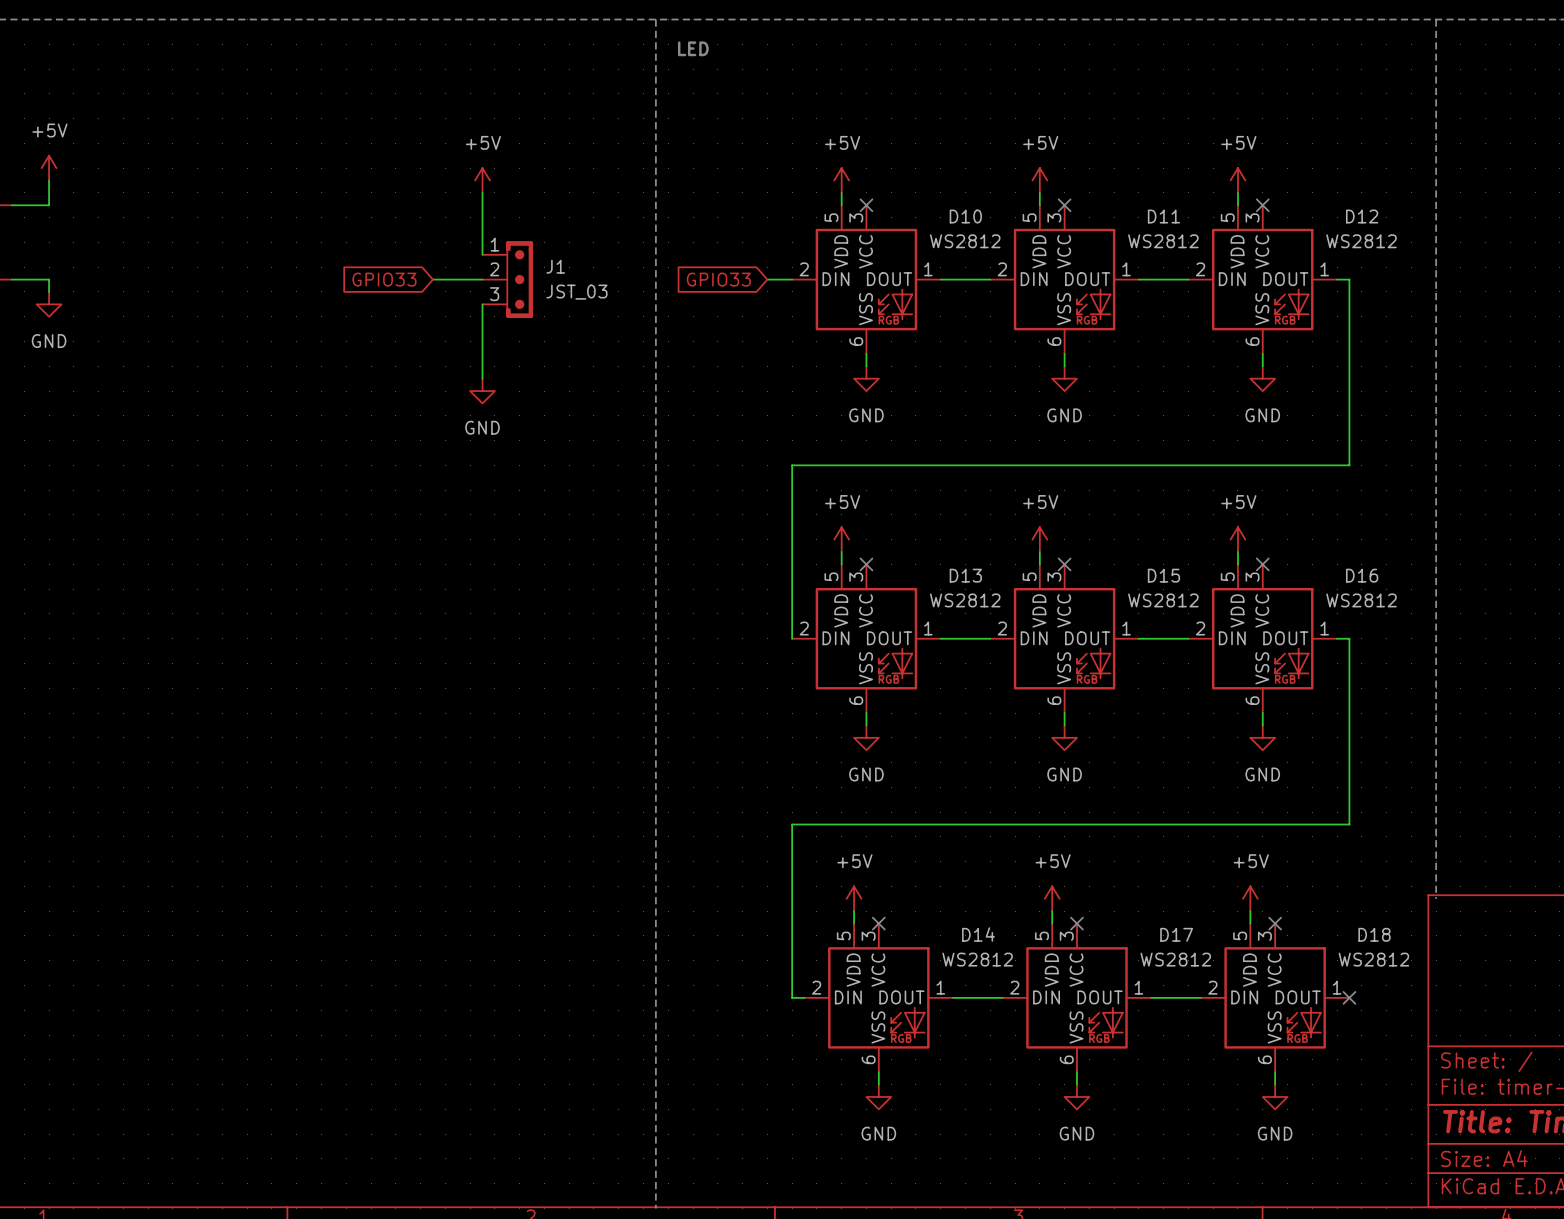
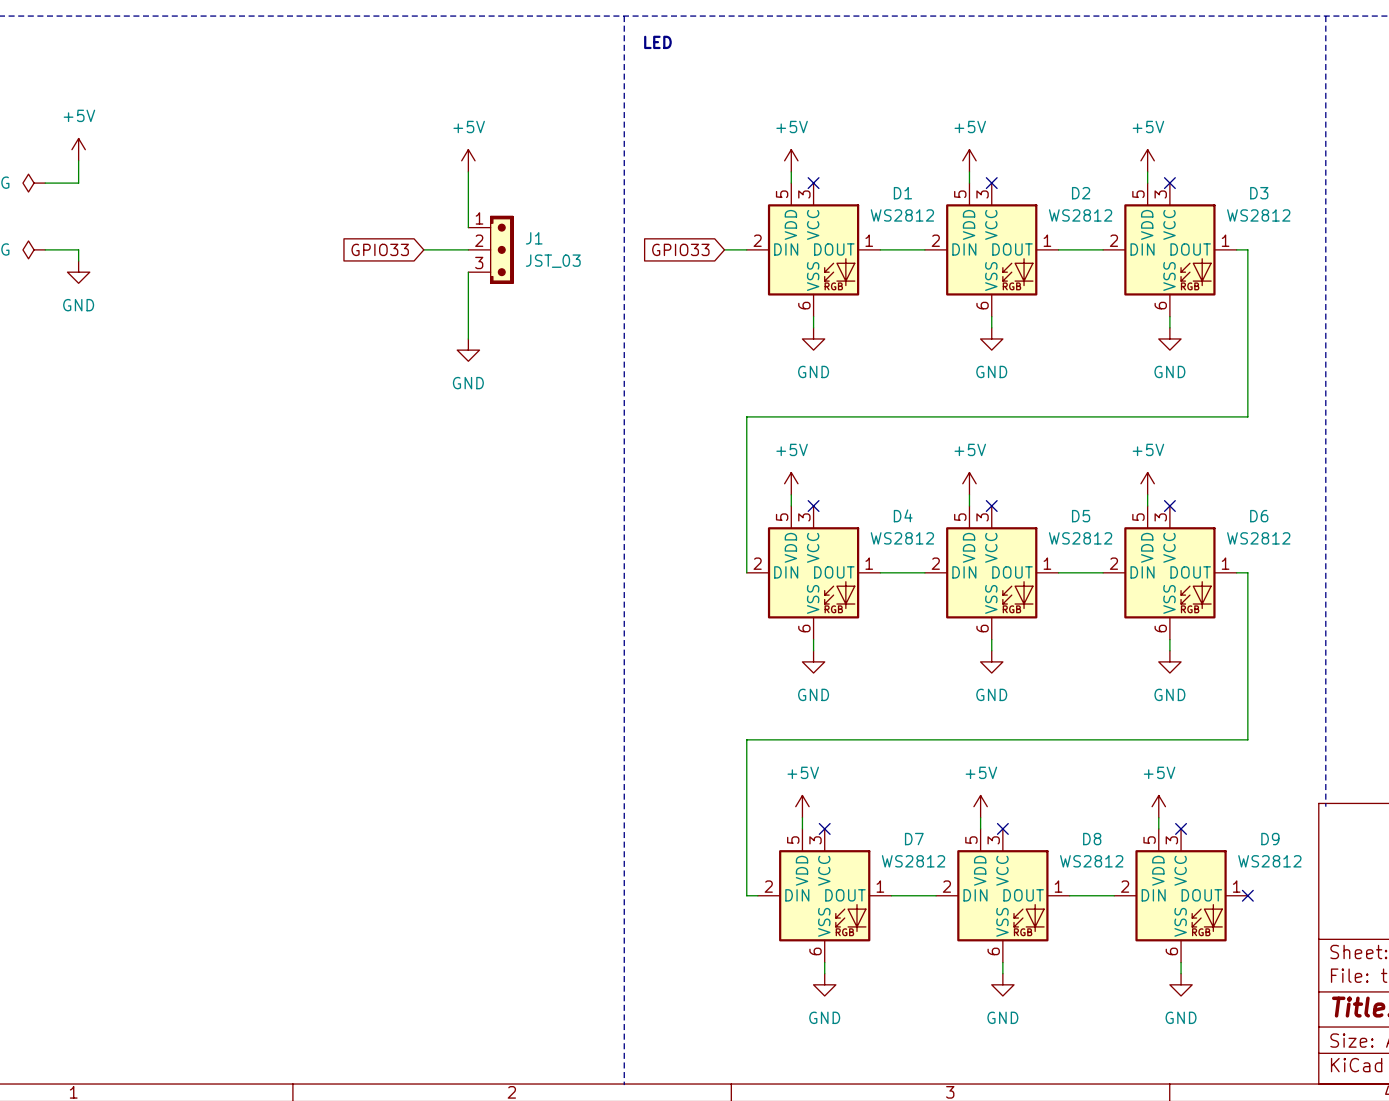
D10 name: D10 (965, 216) -> D1 (902, 193)
D11 name: D11 (1163, 216) -> D2 (1081, 193)
D12 name: D12 (1362, 216) -> D3 (1259, 193)
D13 name: D13 (965, 575) -> D4 (903, 515)
D15 name: D15 (1163, 575) -> D5 (1081, 516)
D16 name: D16 (1362, 575) -> D6 (1259, 516)
D14 name: D14 (978, 934) -> D7 (914, 839)
D17 name: D17 (1176, 934) -> D8 (1092, 839)
D18 name: D18 (1374, 934) -> D9 (1270, 839)

